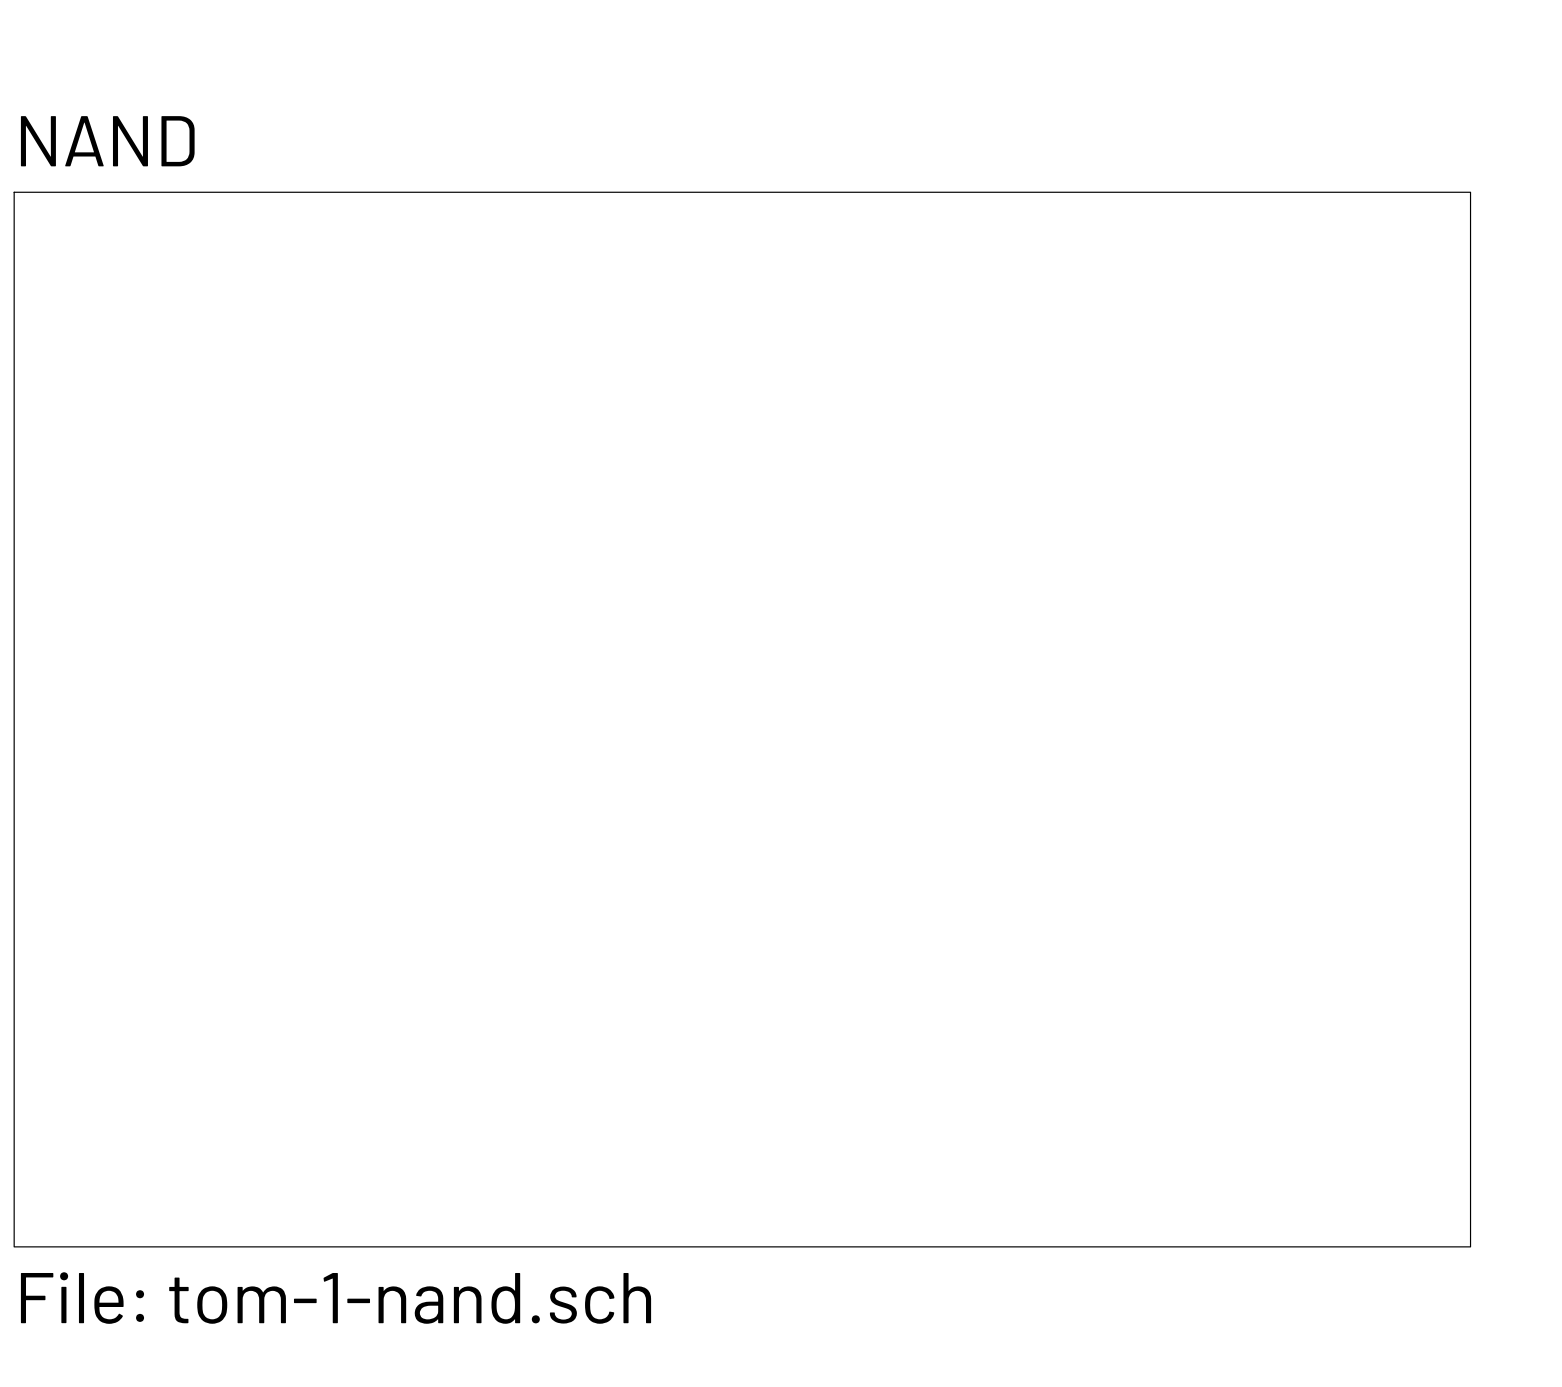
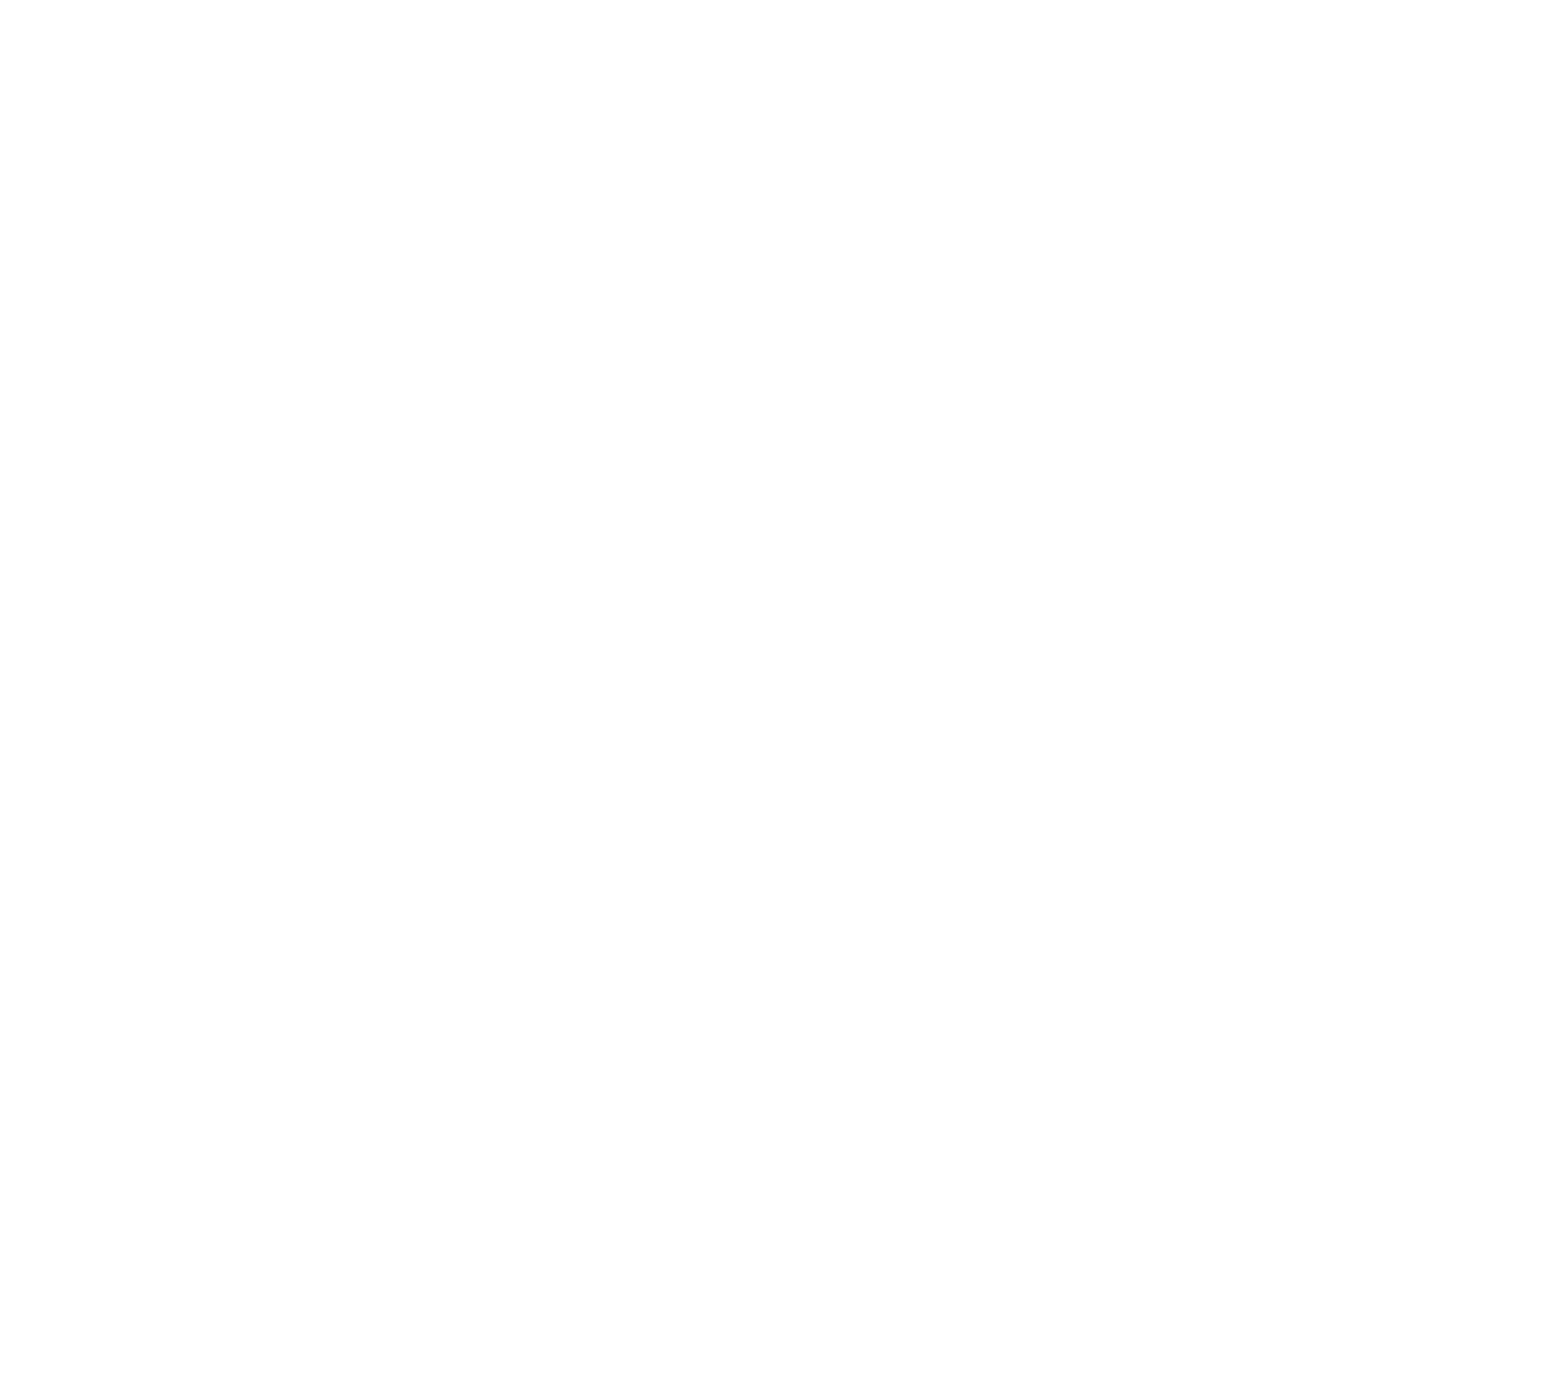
sheet NAND: File: tom-1-nand.sch (742, 719) -> none

